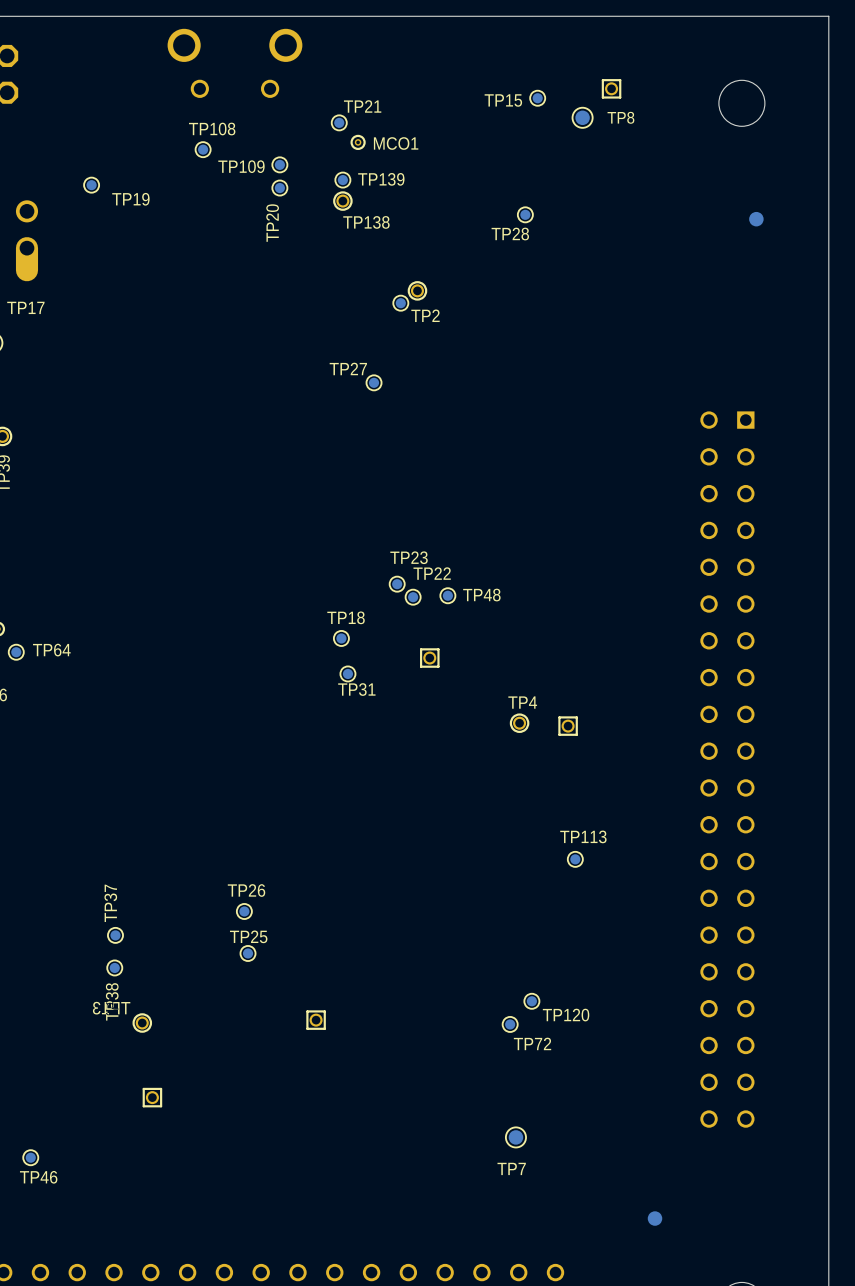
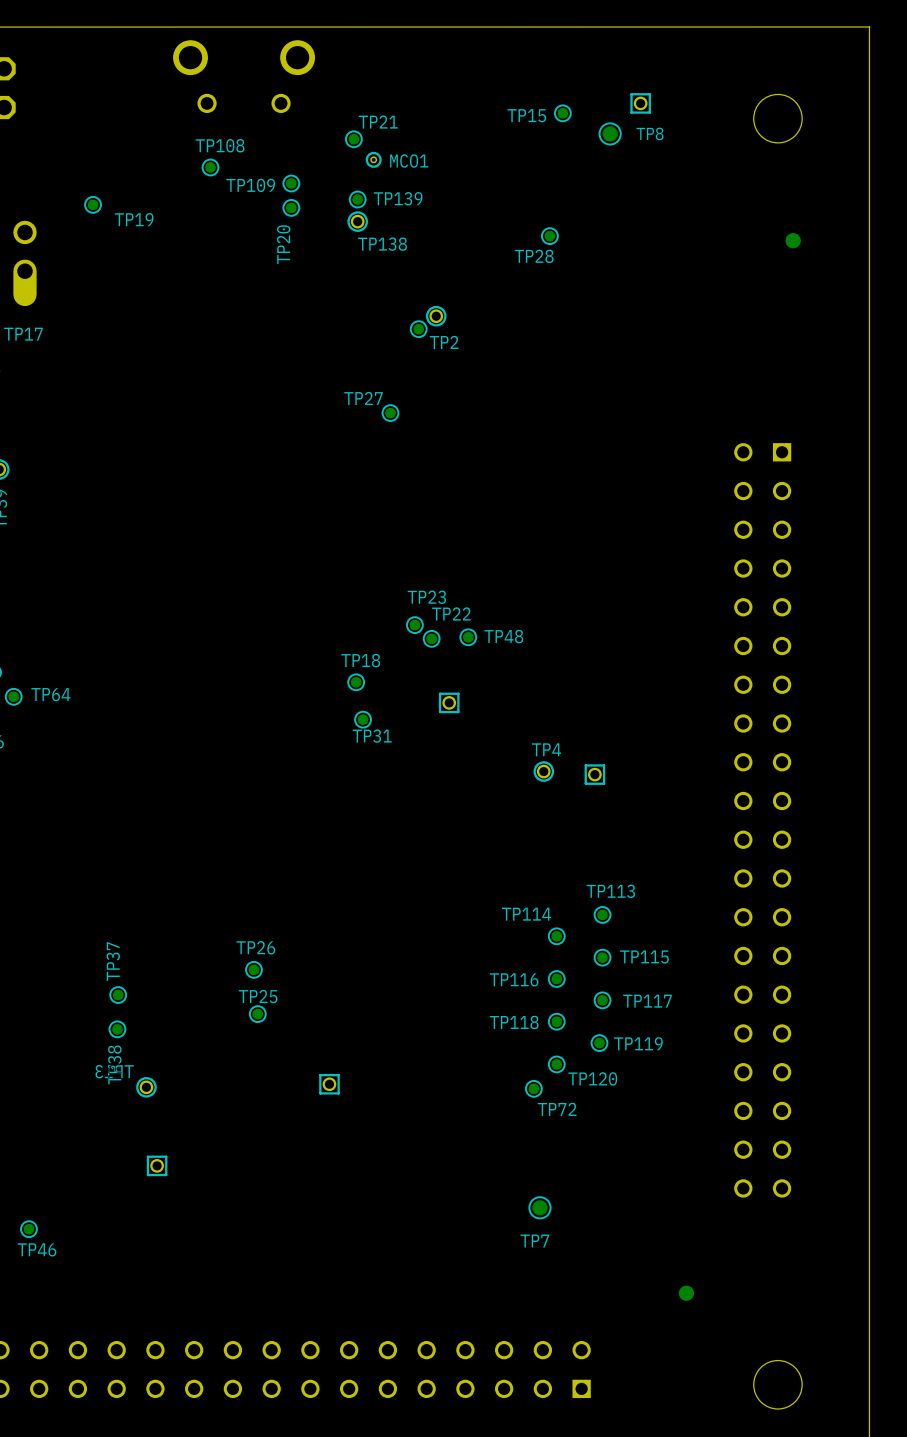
TP114: none -> (556, 936)
TP115: none -> (602, 957)
TP116: none -> (556, 979)
TP117: none -> (602, 1000)
TP118: none -> (556, 1021)
TP119: none -> (599, 1043)

